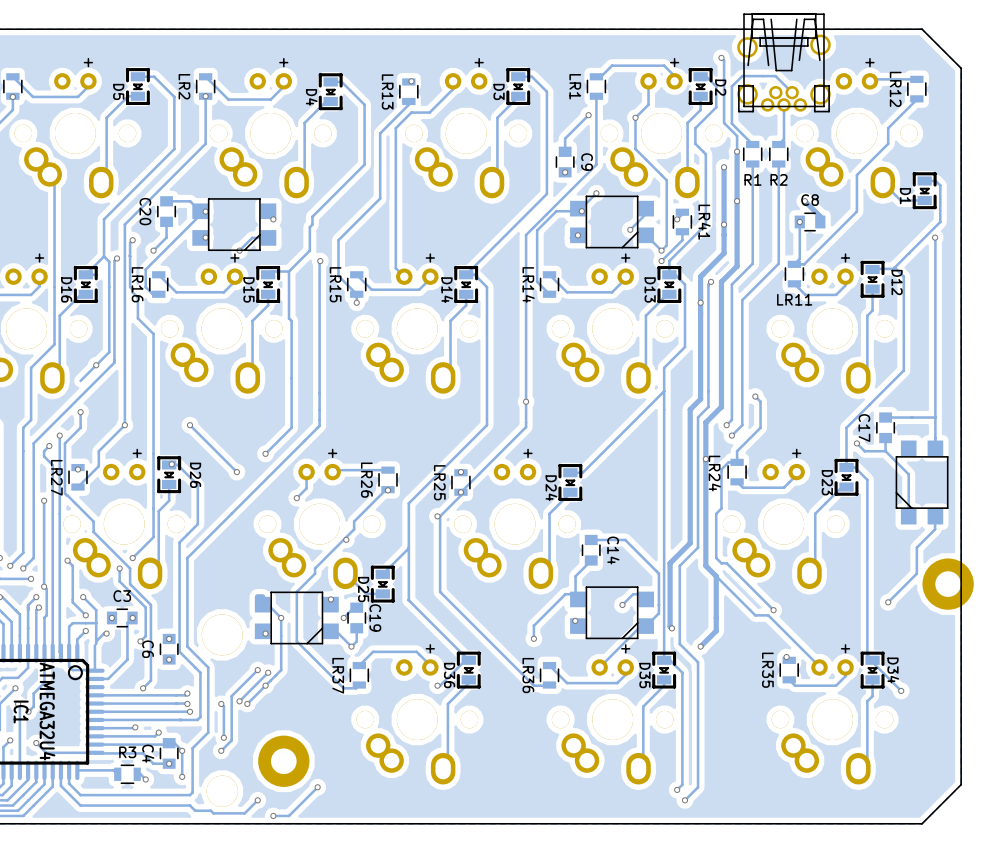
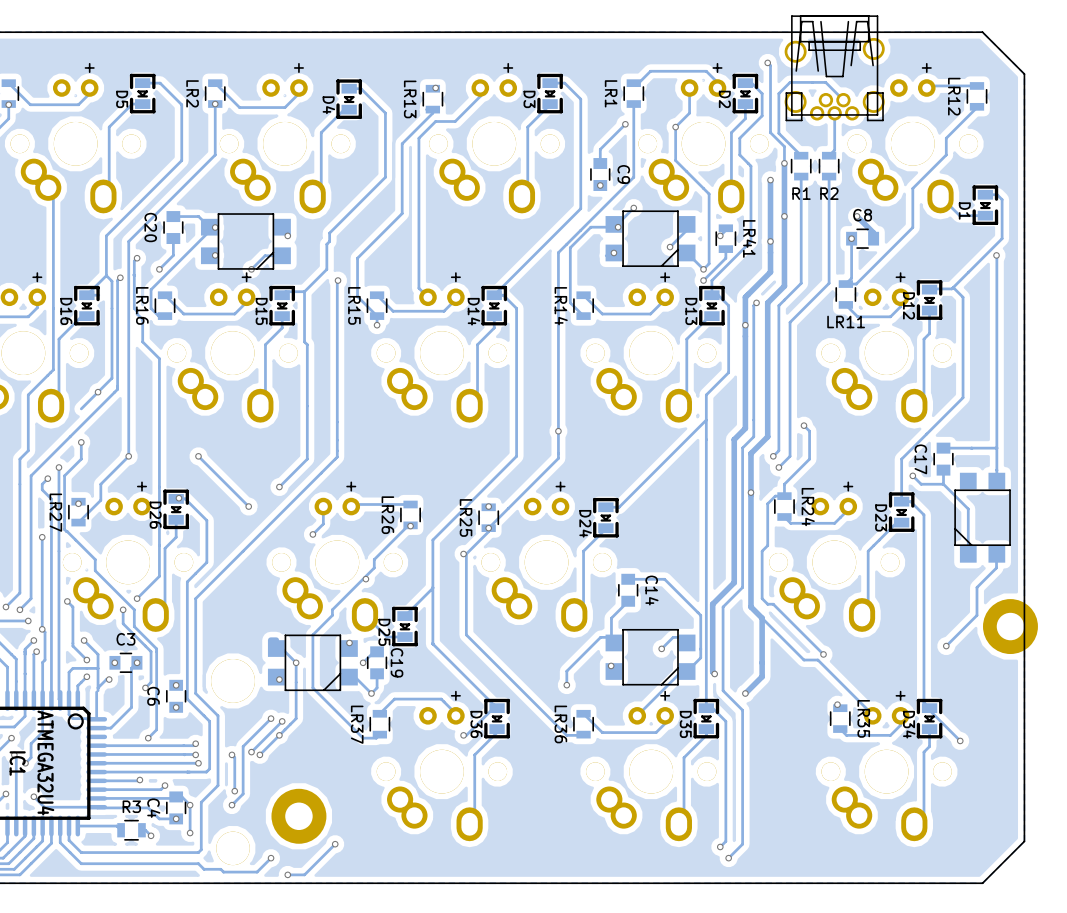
D2 name position: D2 (720, 87) -> D2 (724, 99)
D12 name position: D12 (897, 282) -> D12 (909, 305)
LR24 name position: LR24 (714, 473) -> LR24 (808, 507)
D26 name position: D26 (195, 475) -> D26 (155, 515)
LR35 name position: LR35 (767, 670) -> LR35 (863, 718)
D34 name position: D34 (893, 670) -> D34 (909, 724)

